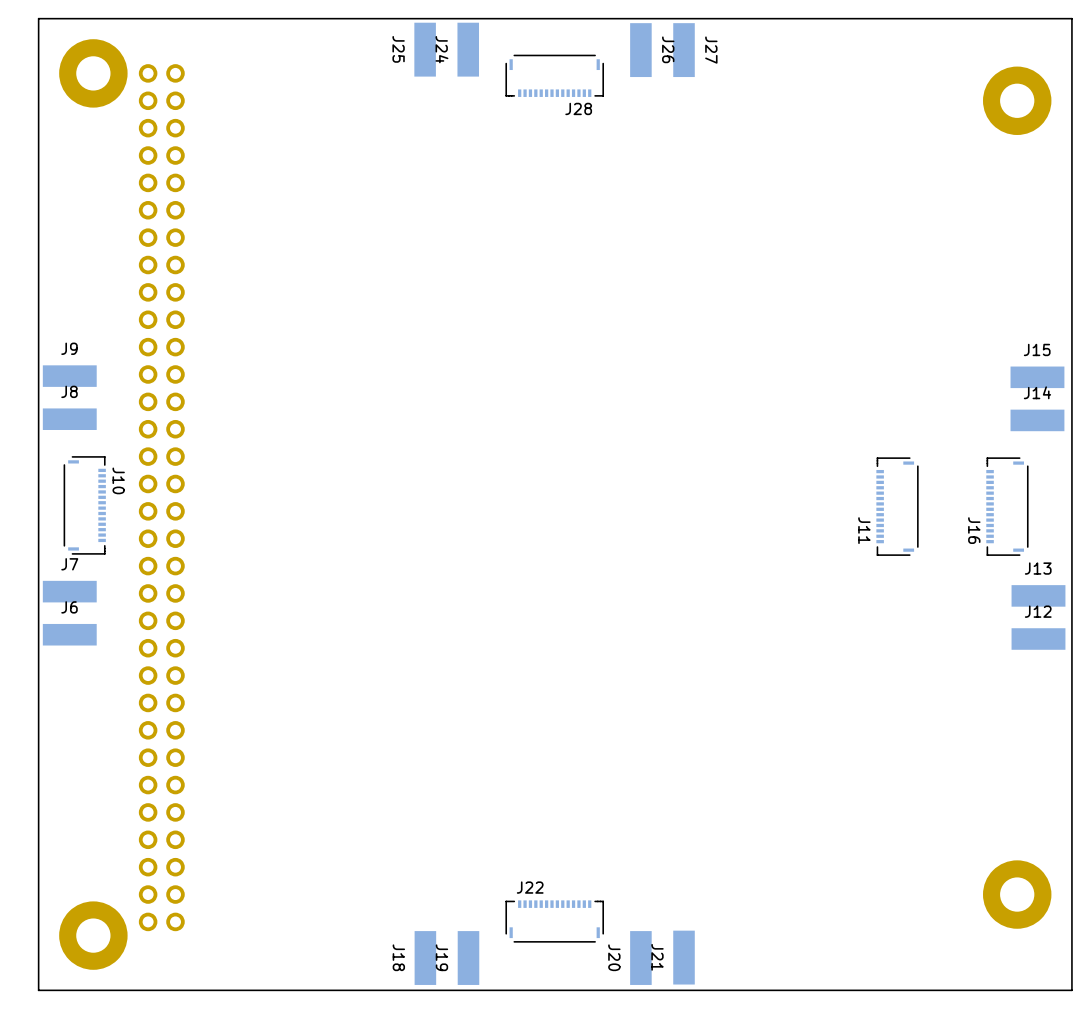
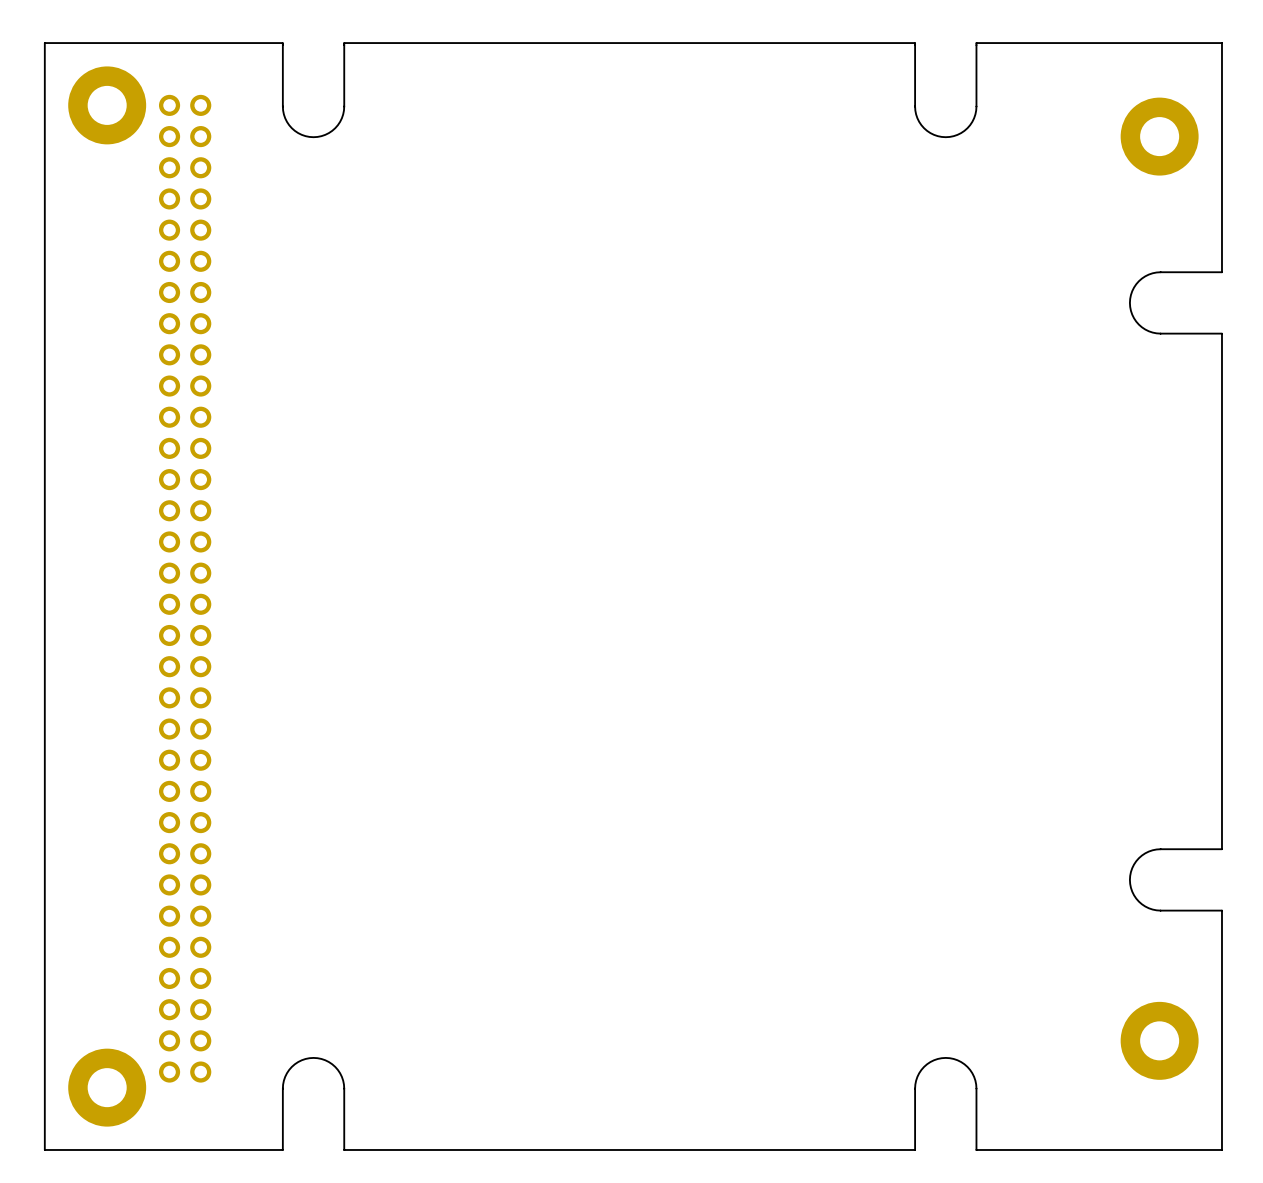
board edge: (301, 18) (247, 18) -> (344, 43) (343, 114) (340, 121) (332, 130) (325, 134) (313, 137) (301, 134) (294, 130) (286, 121) (283, 114) (282, 43)
board edge: (856, 18) (802, 18) -> (976, 43) (975, 114) (970, 125) (964, 130) (953, 136) (945, 137) (934, 134) (927, 130) (919, 121) (916, 114) (915, 43)
J25: (425, 49) -> none
J24: (468, 49) -> none
J26: (640, 50) -> none
J27: (684, 50) -> none
J28: (554, 75) -> none
board edge: (1071, 219) (1071, 273) -> (1221, 272) (1152, 273) (1141, 278) (1136, 284) (1130, 294) (1129, 302) (1130, 310) (1136, 321) (1141, 327) (1152, 332) (1221, 333)
J9: (69, 376) -> none
J15: (1037, 377) -> none
J8: (69, 419) -> none
J14: (1037, 420) -> none
J10: (84, 505) -> none
J11: (897, 506) -> none
J16: (1007, 506) -> none
J7: (69, 591) -> none
J13: (1038, 595) -> none
J6: (69, 634) -> none
J12: (1038, 639) -> none
board edge: (1071, 726) (1071, 780) -> (1221, 849) (1152, 850) (1141, 855) (1136, 861) (1130, 871) (1129, 879) (1130, 887) (1136, 898) (1141, 904) (1152, 909) (1221, 910)
J22: (554, 921) -> none
J21: (684, 957) -> none
J18: (425, 958) -> none
J19: (468, 958) -> none
J20: (640, 958) -> none
board edge: (301, 990) (247, 990) -> (344, 1149) (343, 1080) (340, 1073) (332, 1064) (325, 1060) (313, 1057) (301, 1060) (294, 1064) (286, 1073) (283, 1080) (282, 1149)
board edge: (856, 990) (802, 990) -> (976, 1149) (975, 1080) (970, 1069) (964, 1064) (957, 1060) (945, 1057) (934, 1060) (927, 1064) (919, 1073) (916, 1080) (915, 1149)

